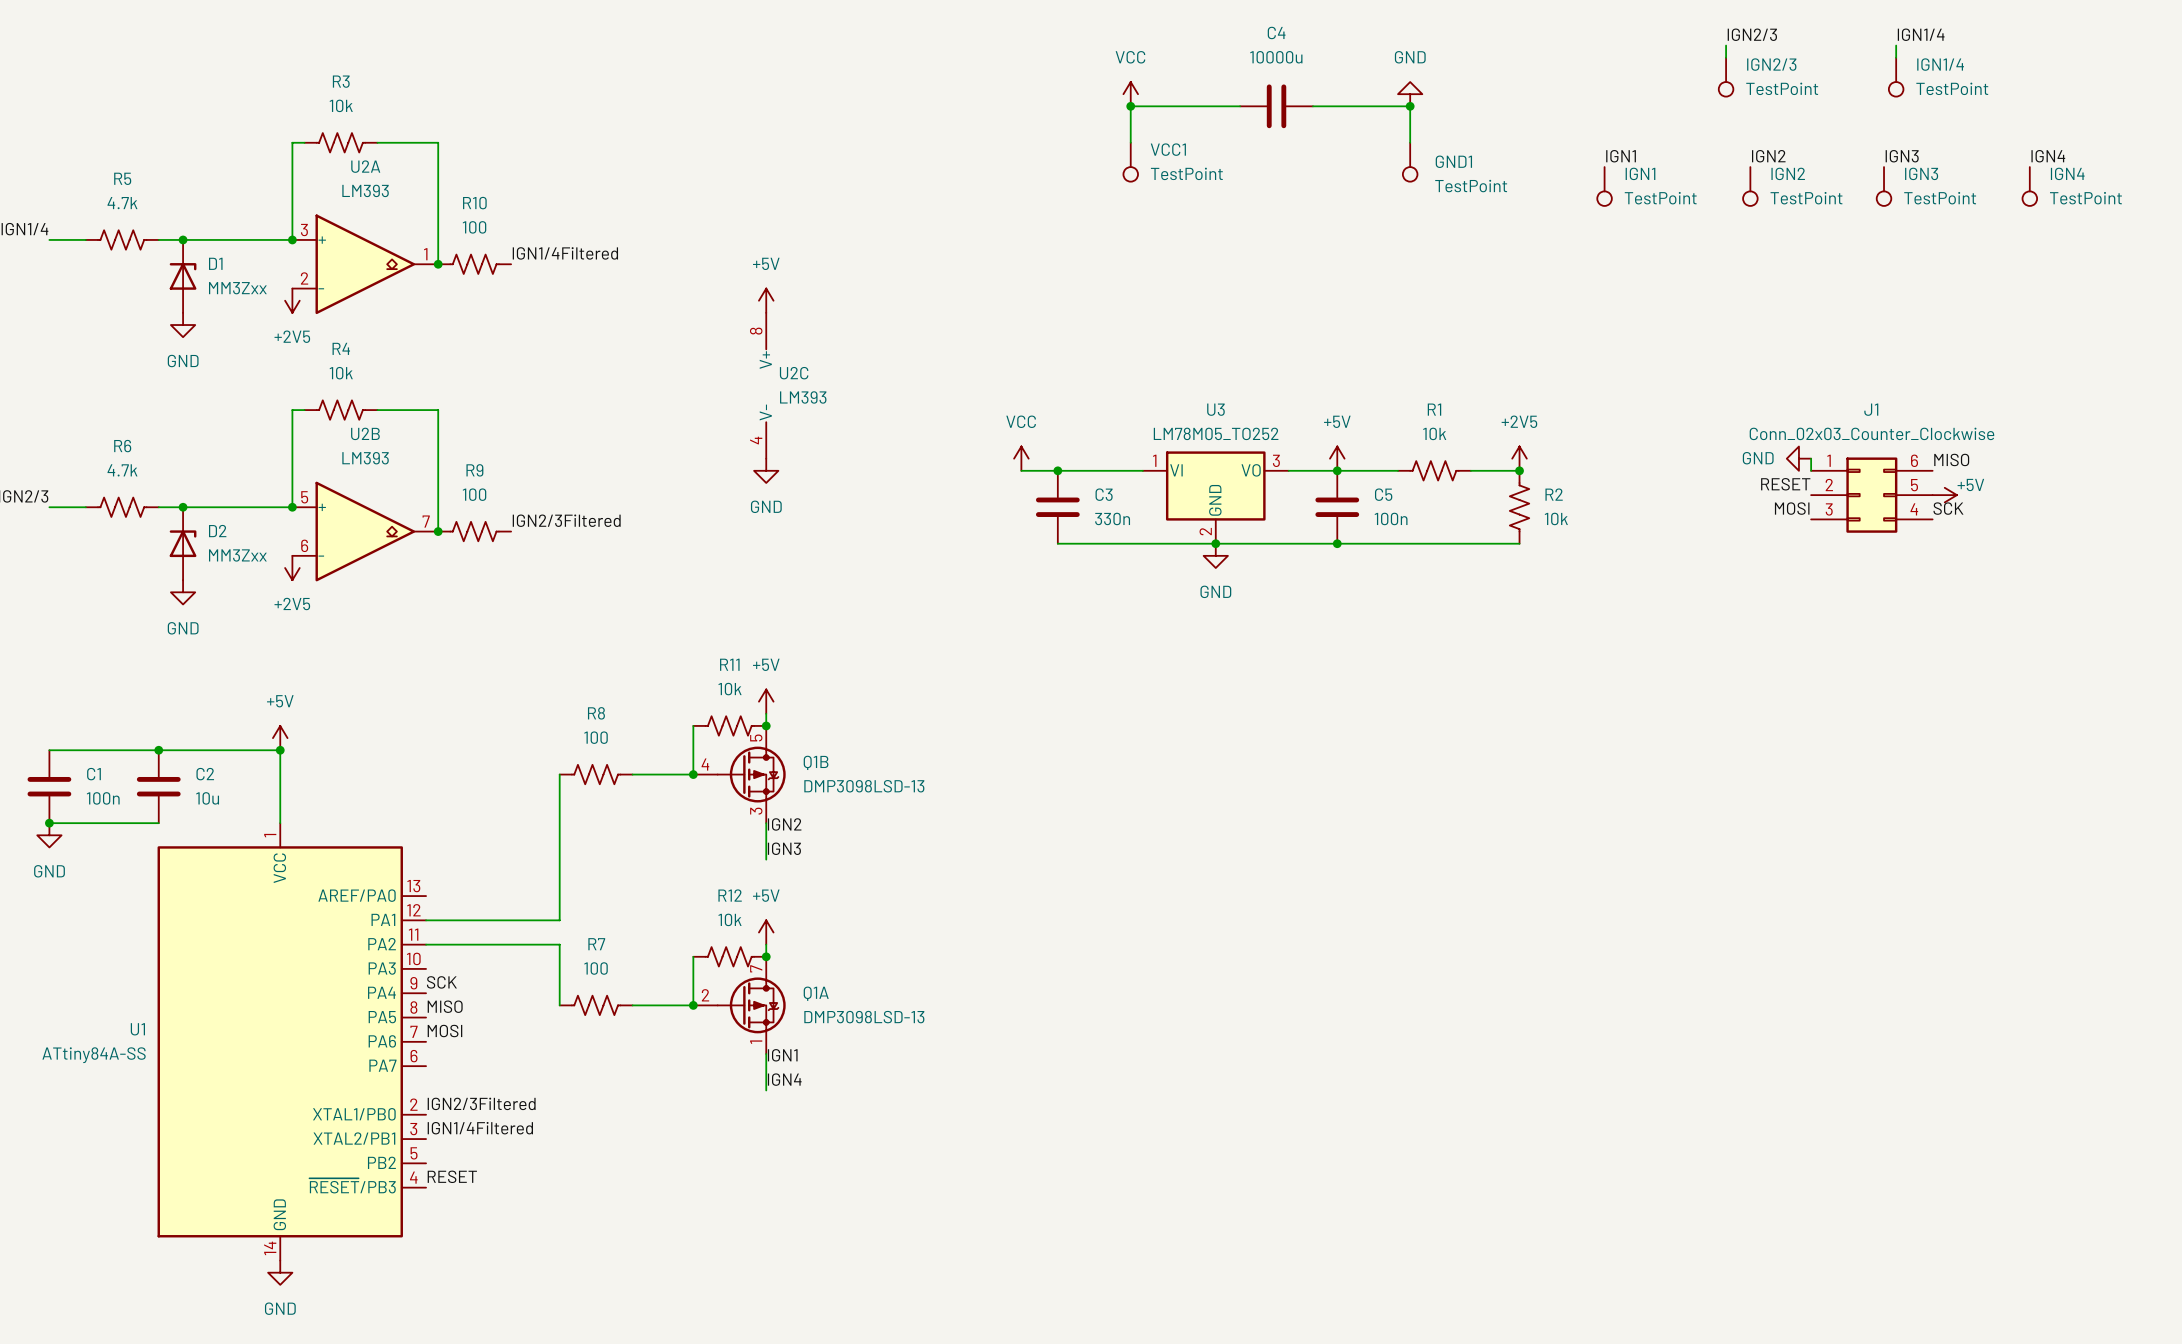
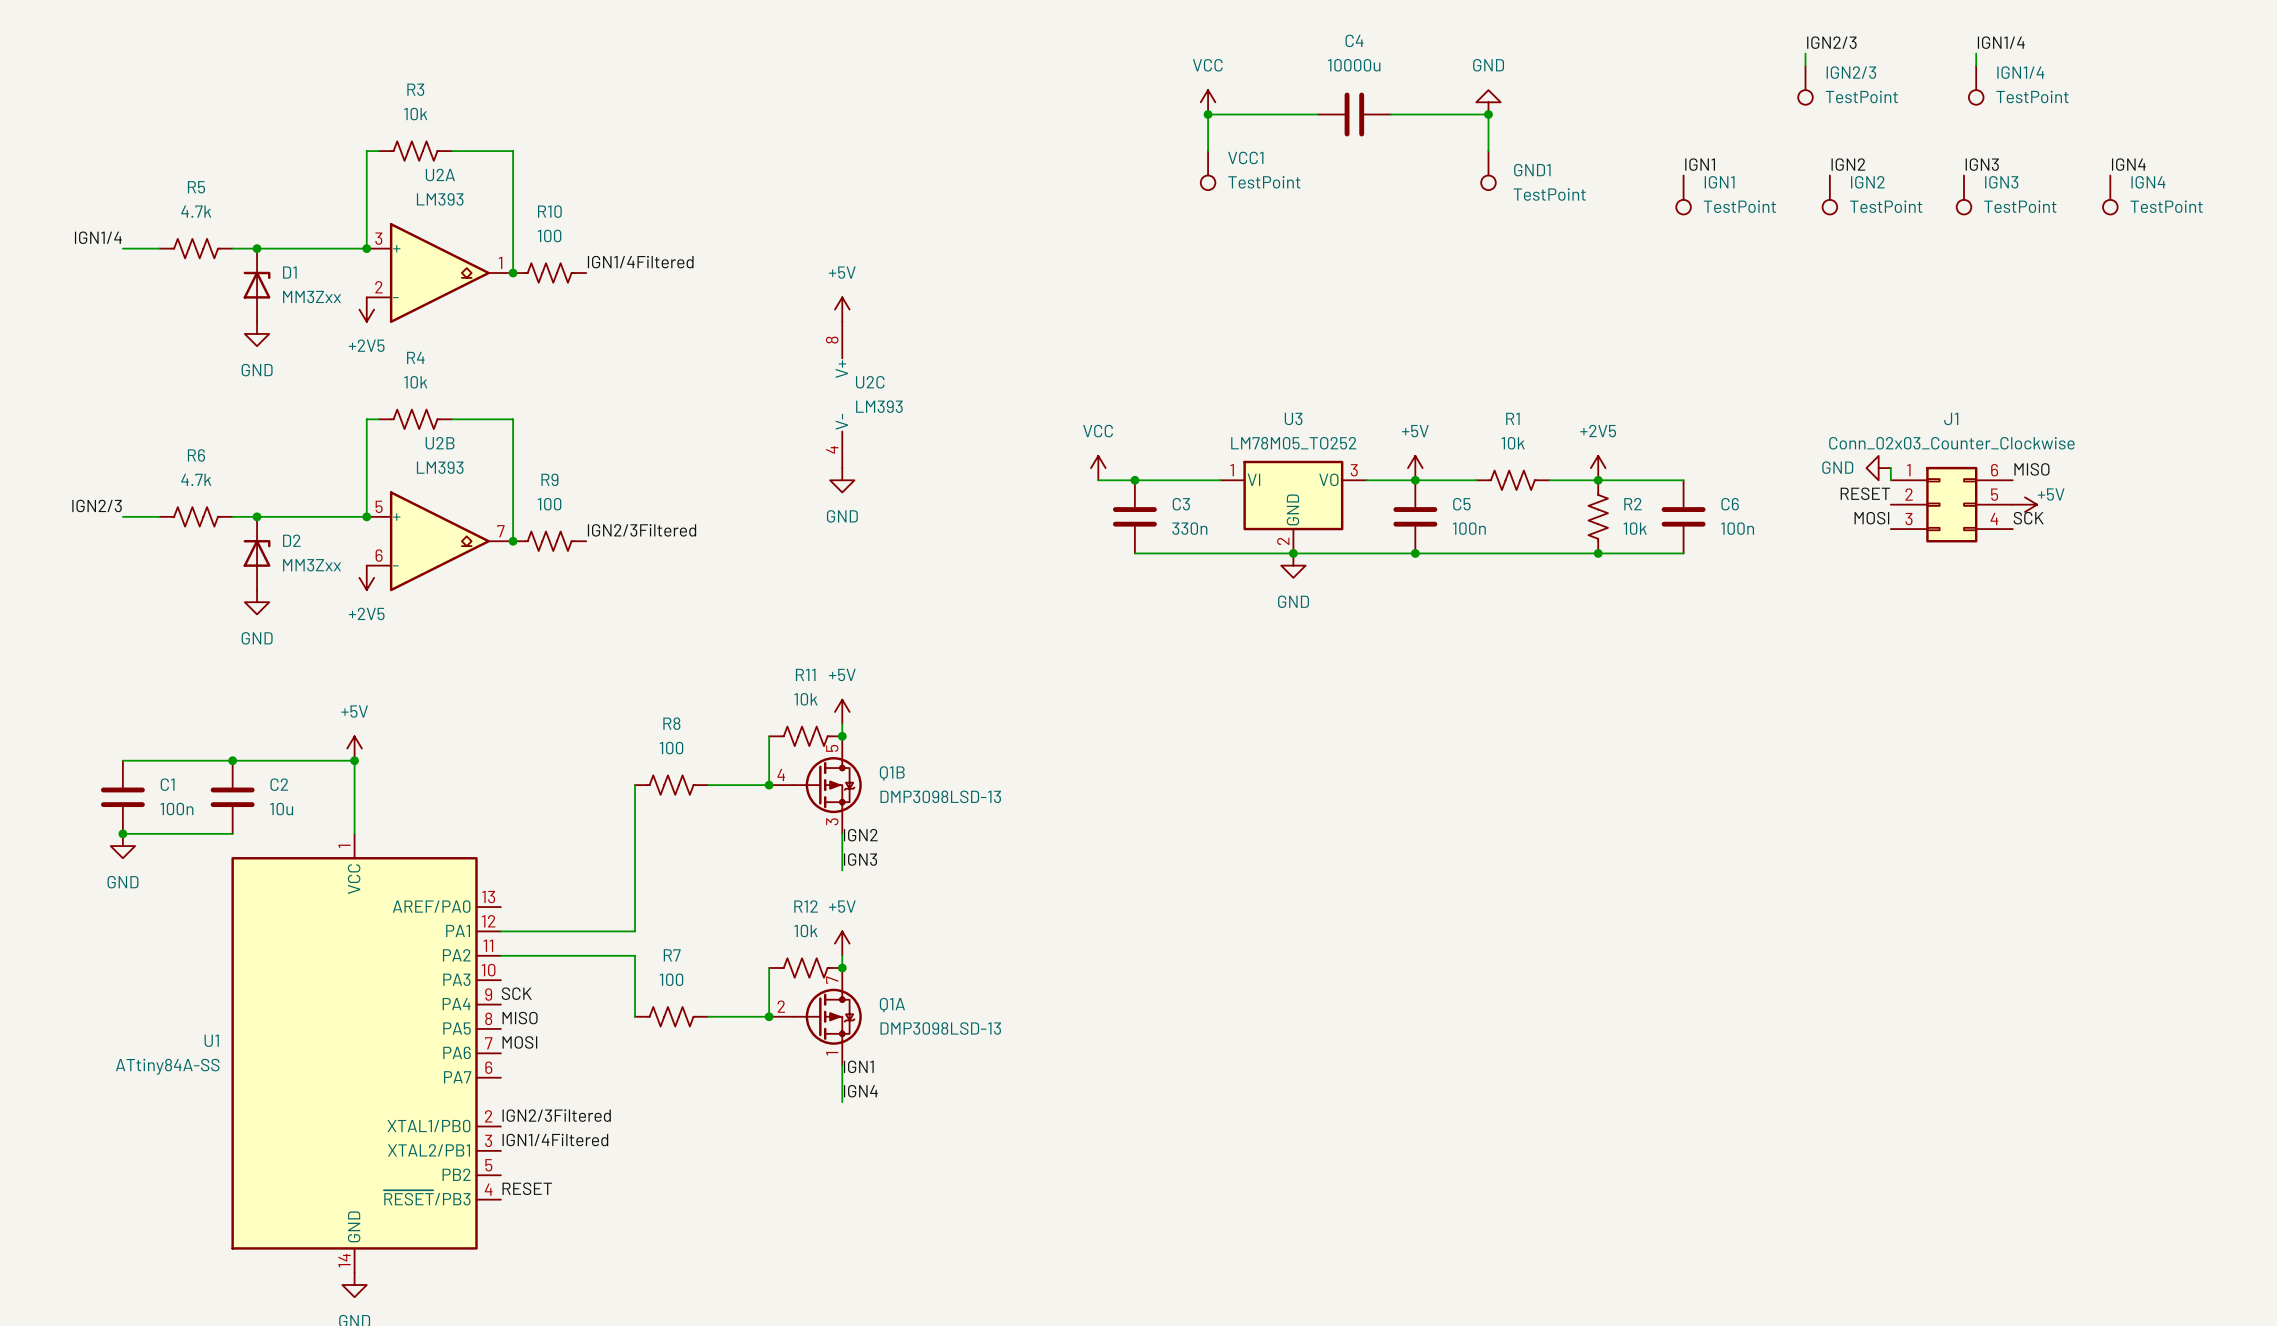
wire: none -> (1598, 480) (1683, 480)
C6: none -> 100n (1683, 516)
wire: none -> (1598, 553) (1683, 553)
junction: none -> (1598, 553)

